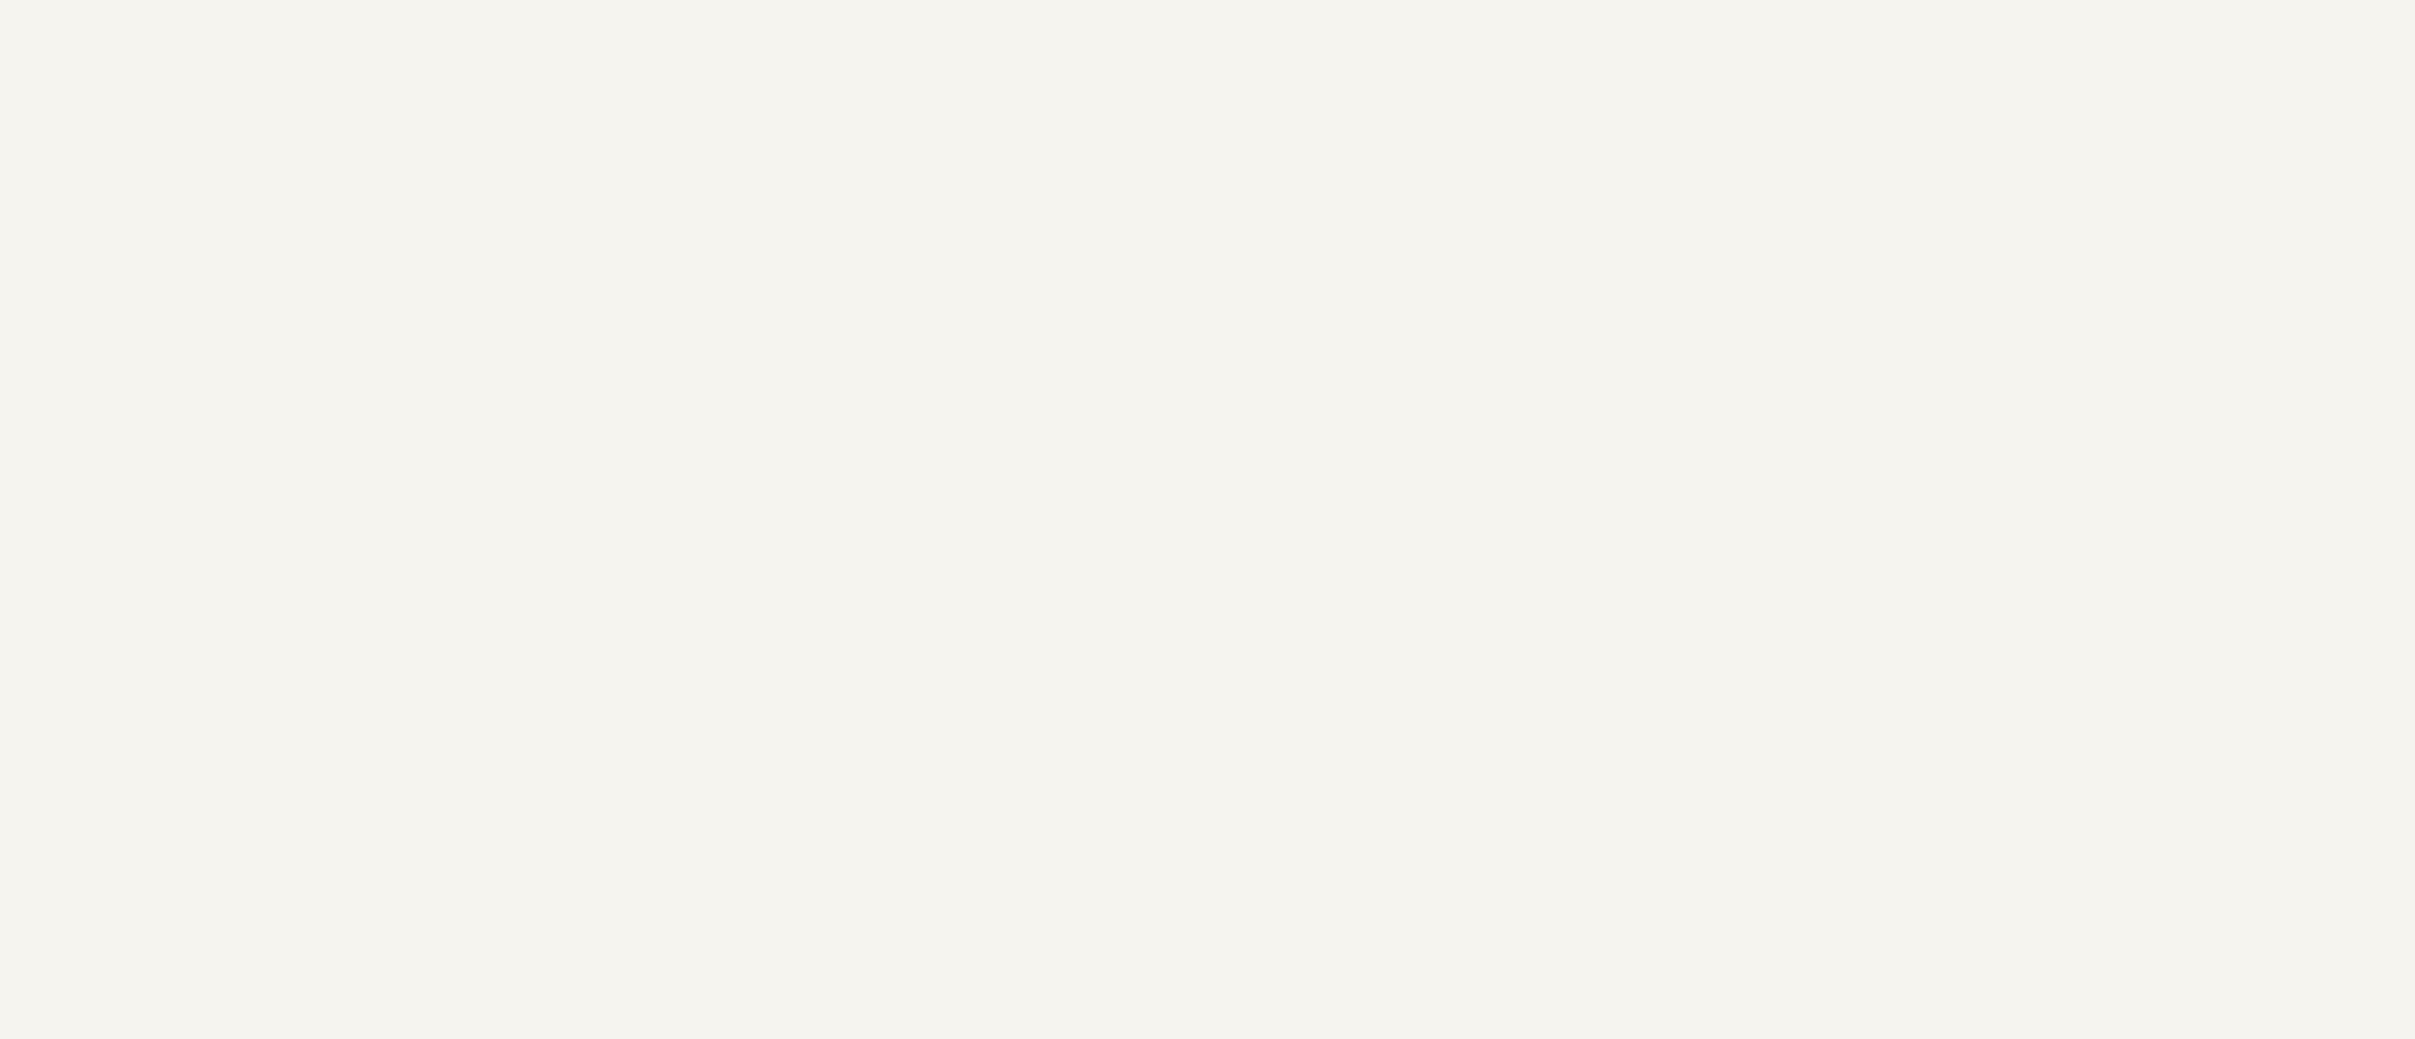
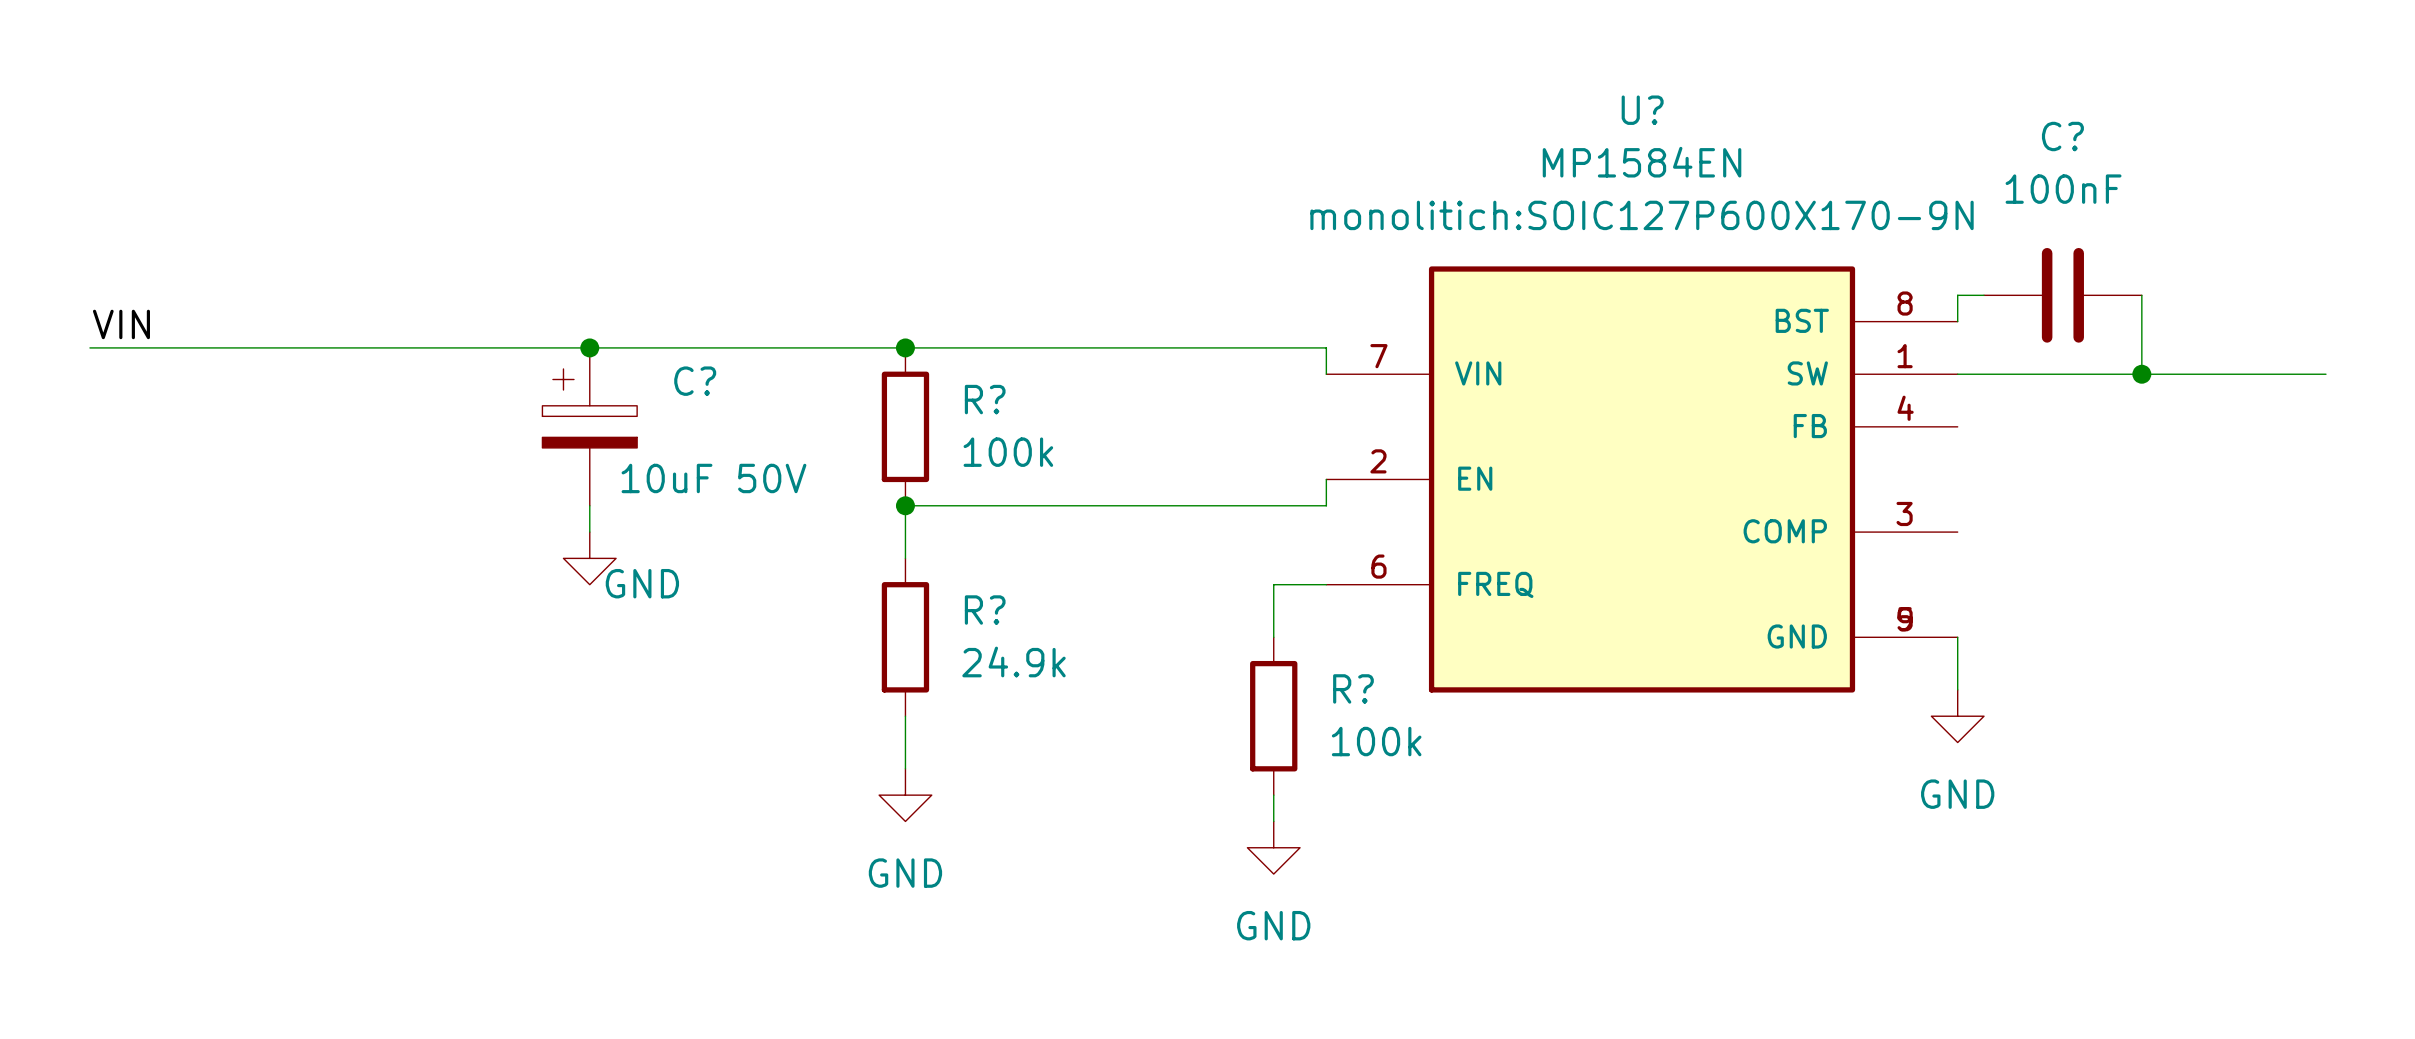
wire: none -> (1984, 295) (1957, 295) (1957, 321)
C?: none -> 100nF (2062, 295)
wire: none -> (2141, 295) (2141, 374)
label: none -> VIN (121, 324)
wire: none -> (89, 347) (1326, 347) (1326, 374)
junction: none -> (589, 347)
junction: none -> (905, 347)
wire: none -> (1957, 374) (2325, 374)
junction: none -> (2141, 374)
C?: none -> 10uF 50V (589, 426)
R?: none -> 100k (905, 426)
wire: none -> (1326, 479) (1326, 505) (905, 505) (905, 558)
U?: none -> MP1584EN (1642, 479)
wire: none -> (589, 505) (589, 532)
junction: none -> (905, 505)
power symbol: none -> GND (589, 558)
wire: none -> (1326, 584) (1273, 584) (1273, 637)
R?: none -> 24.9k (905, 637)
wire: none -> (1957, 637) (1957, 689)
wire: none -> (905, 716) (905, 768)
R?: none -> 100k (1273, 716)
power symbol: none -> GND (1957, 716)
power symbol: none -> GND (905, 795)
wire: none -> (1273, 795) (1273, 821)
power symbol: none -> GND (1273, 847)

